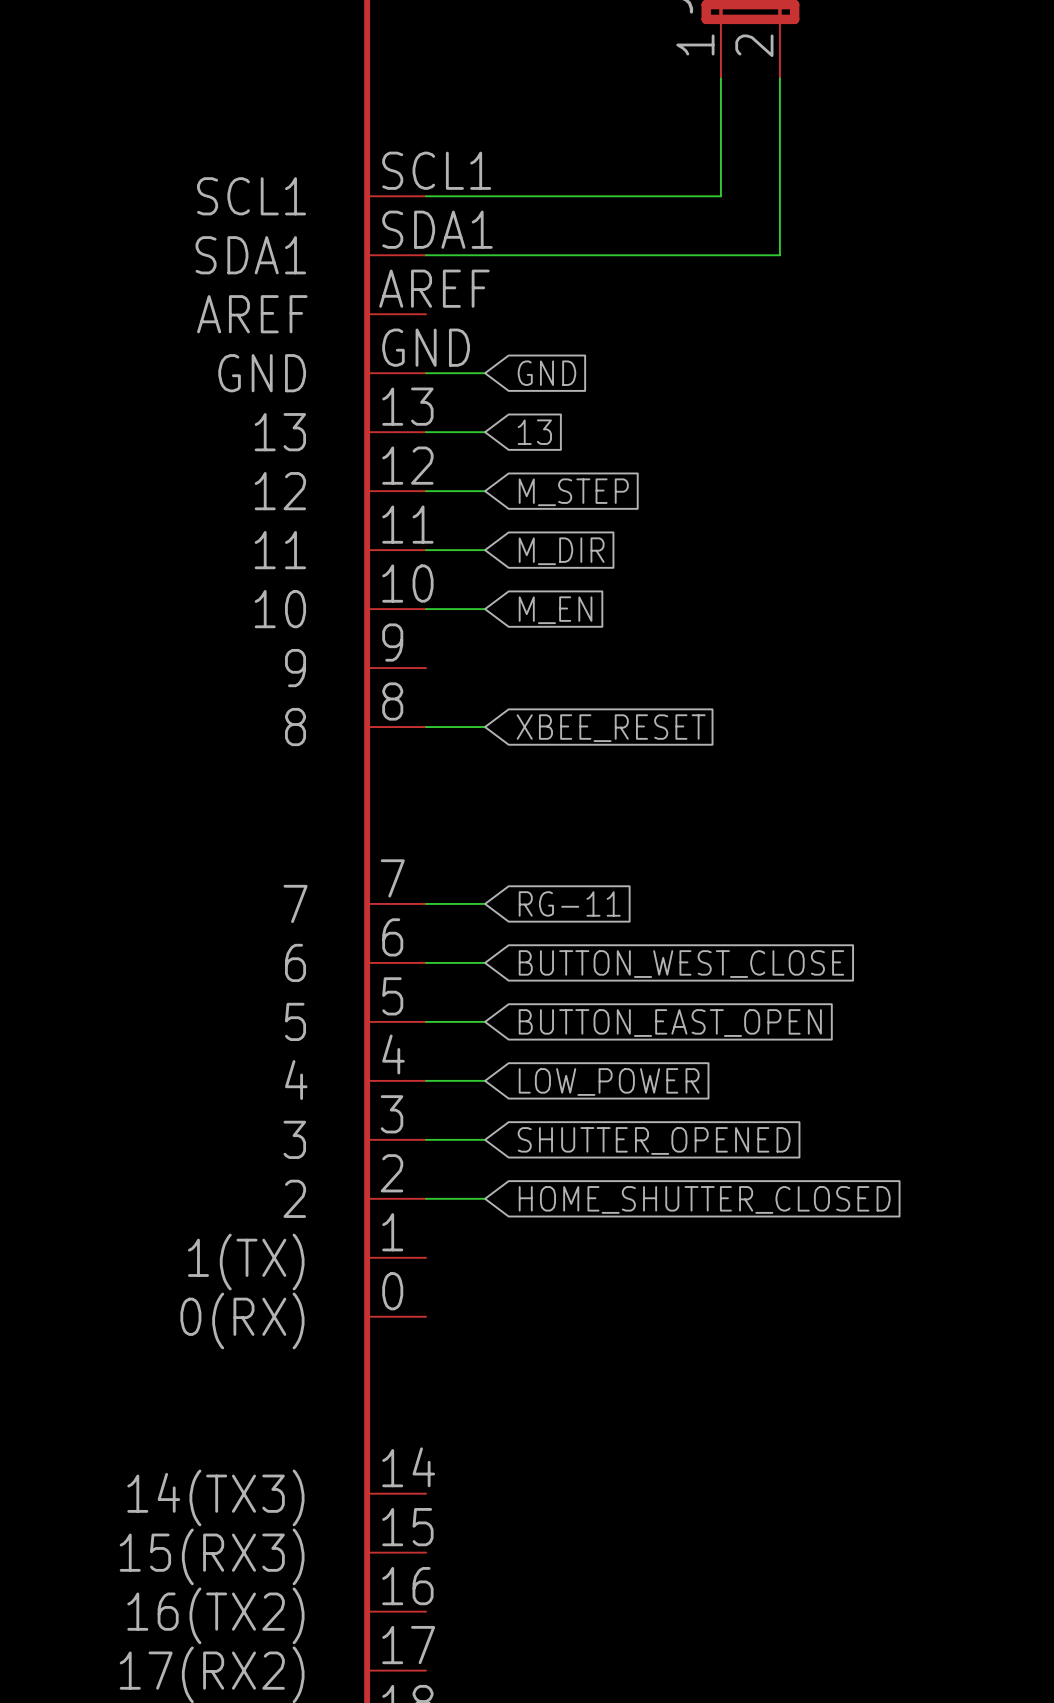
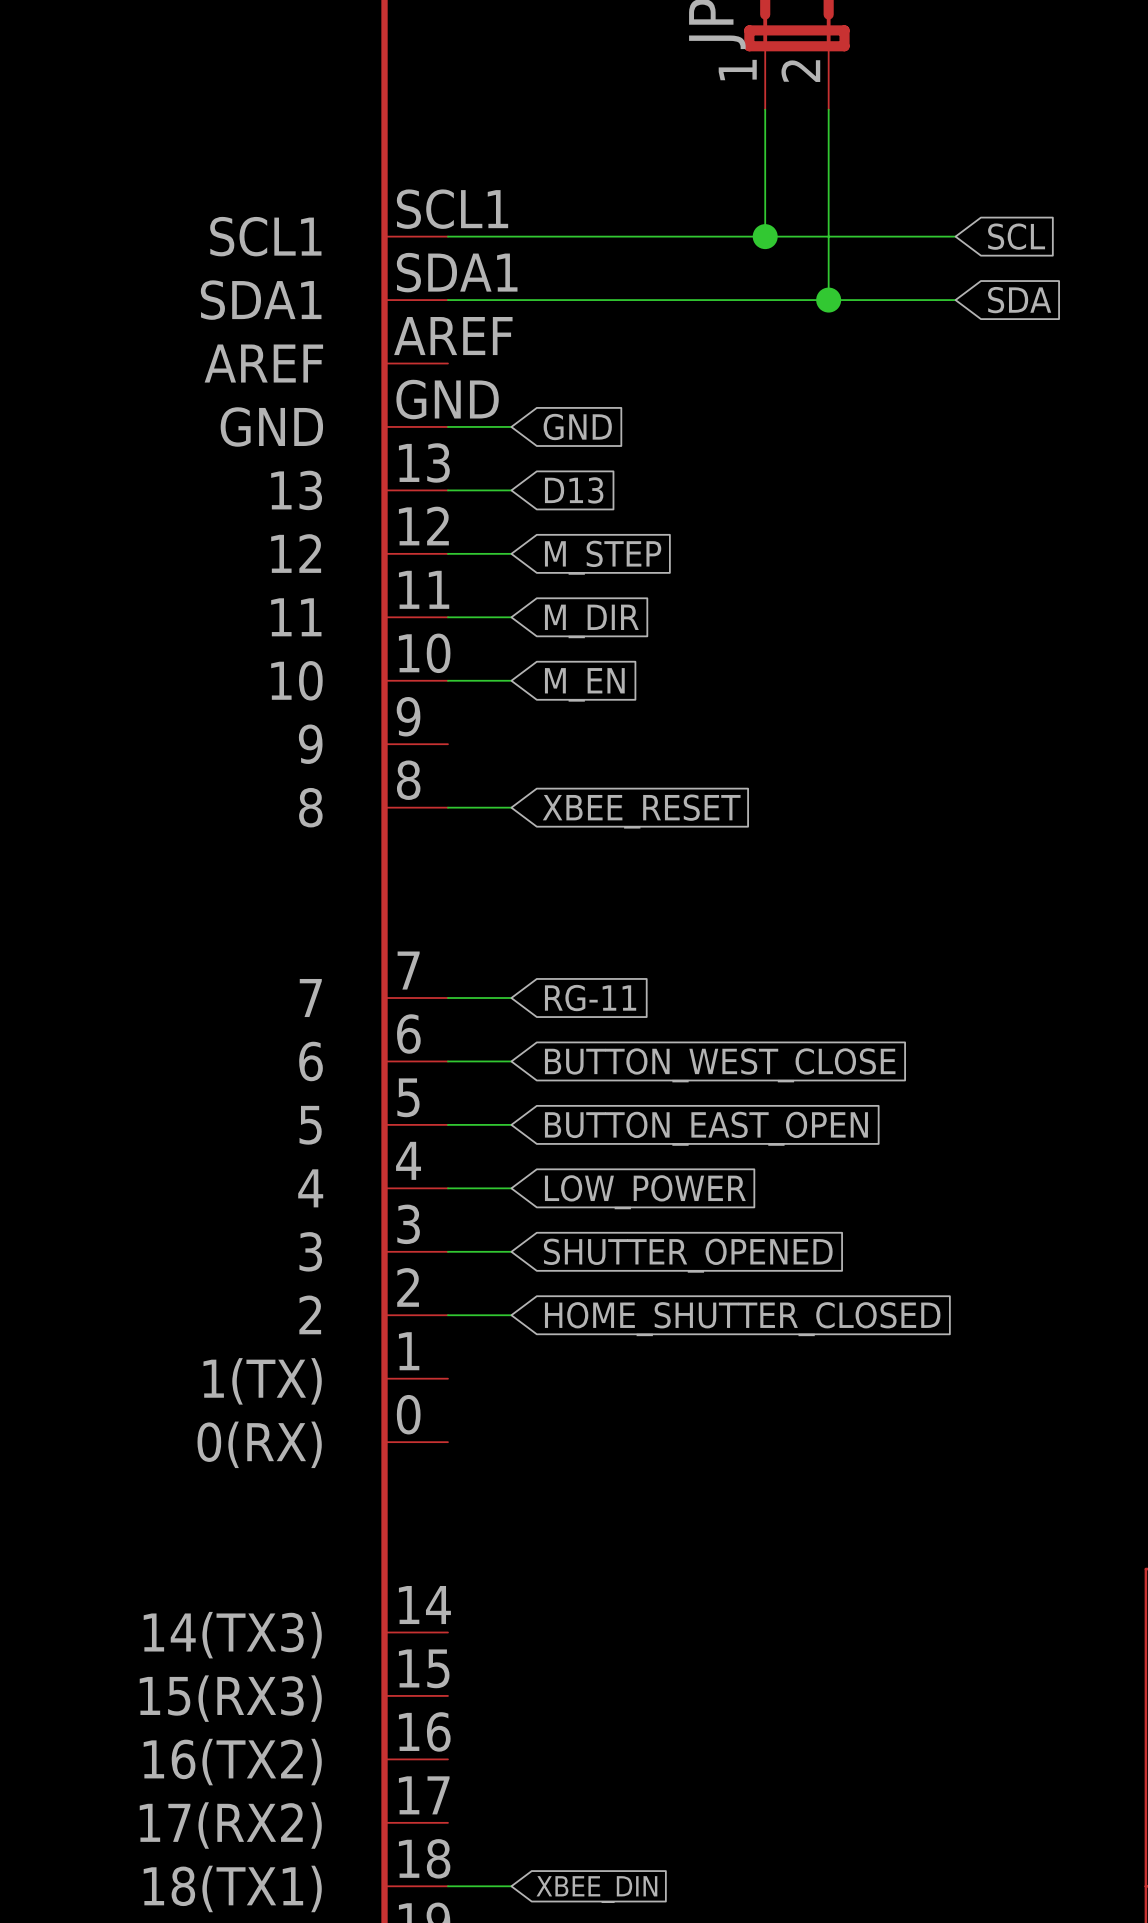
wire: none -> (765, 236) (955, 236)
junction: none -> (765, 236)
global label: none -> SCL (1016, 236)
wire: none -> (828, 300) (955, 300)
junction: none -> (828, 300)
global label: none -> SDA (1019, 300)
global label: 13 (534, 432) -> D13 (574, 490)

